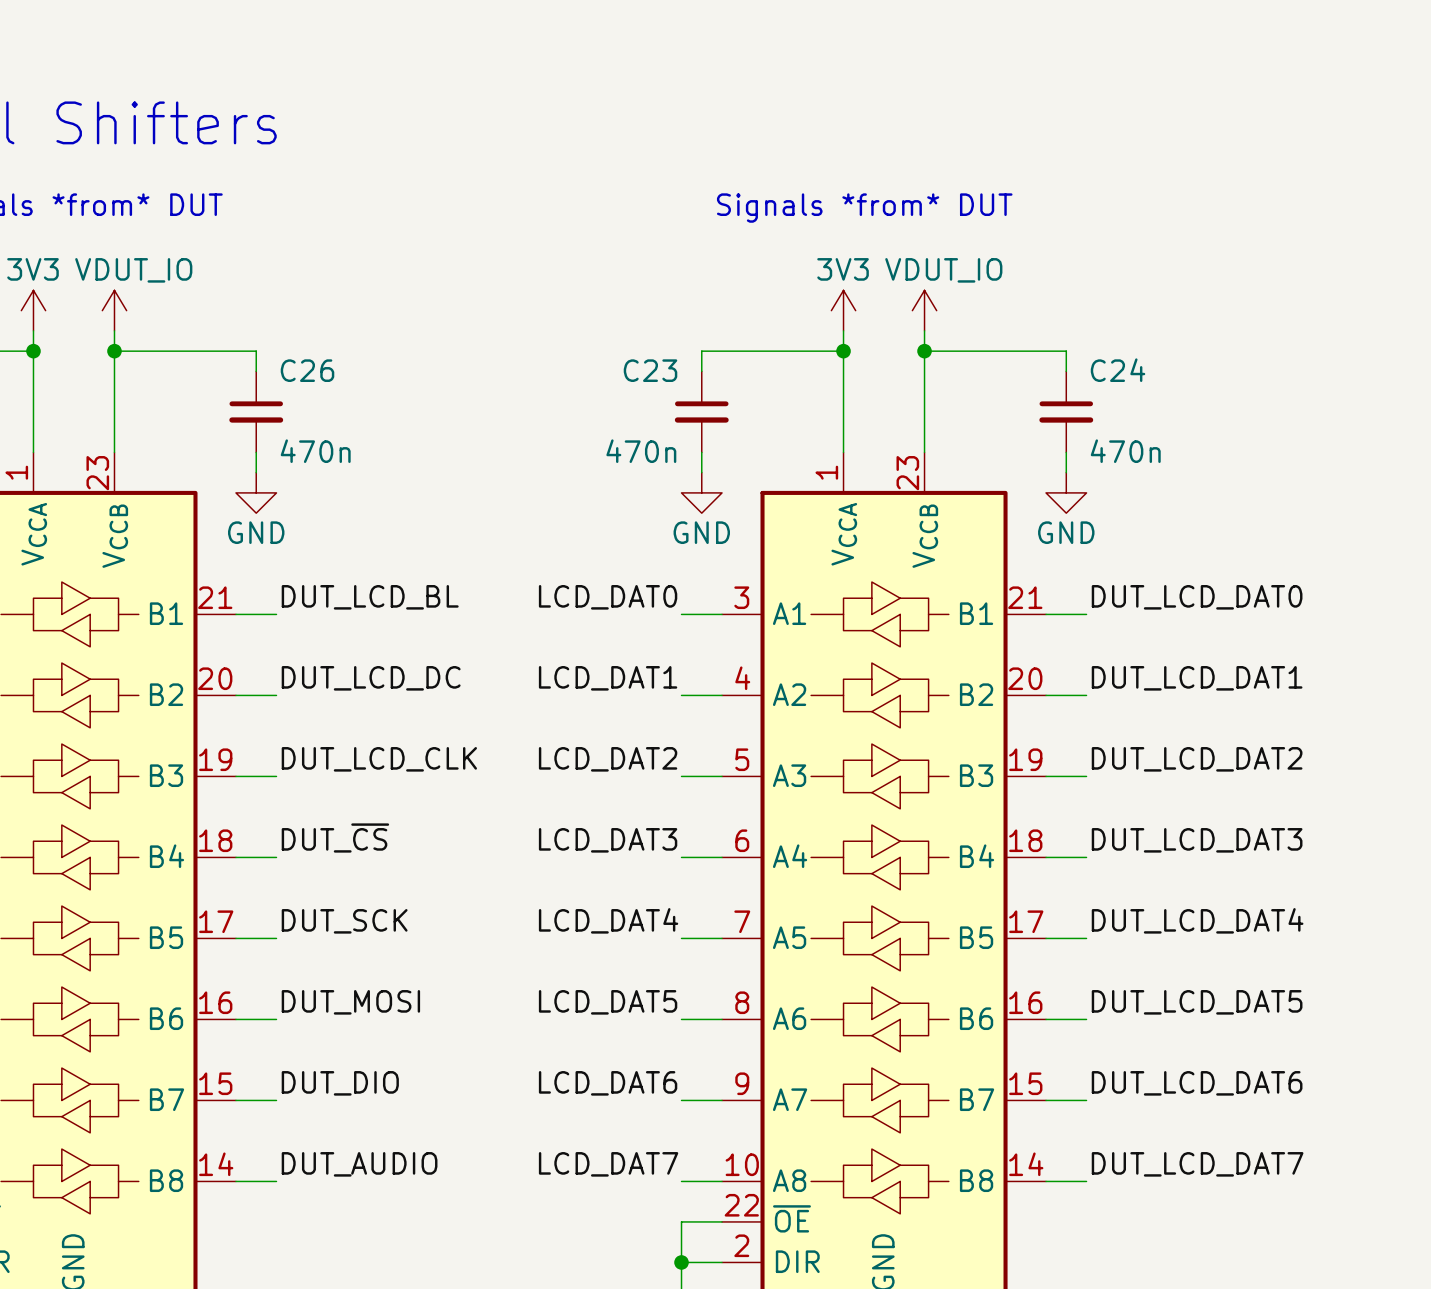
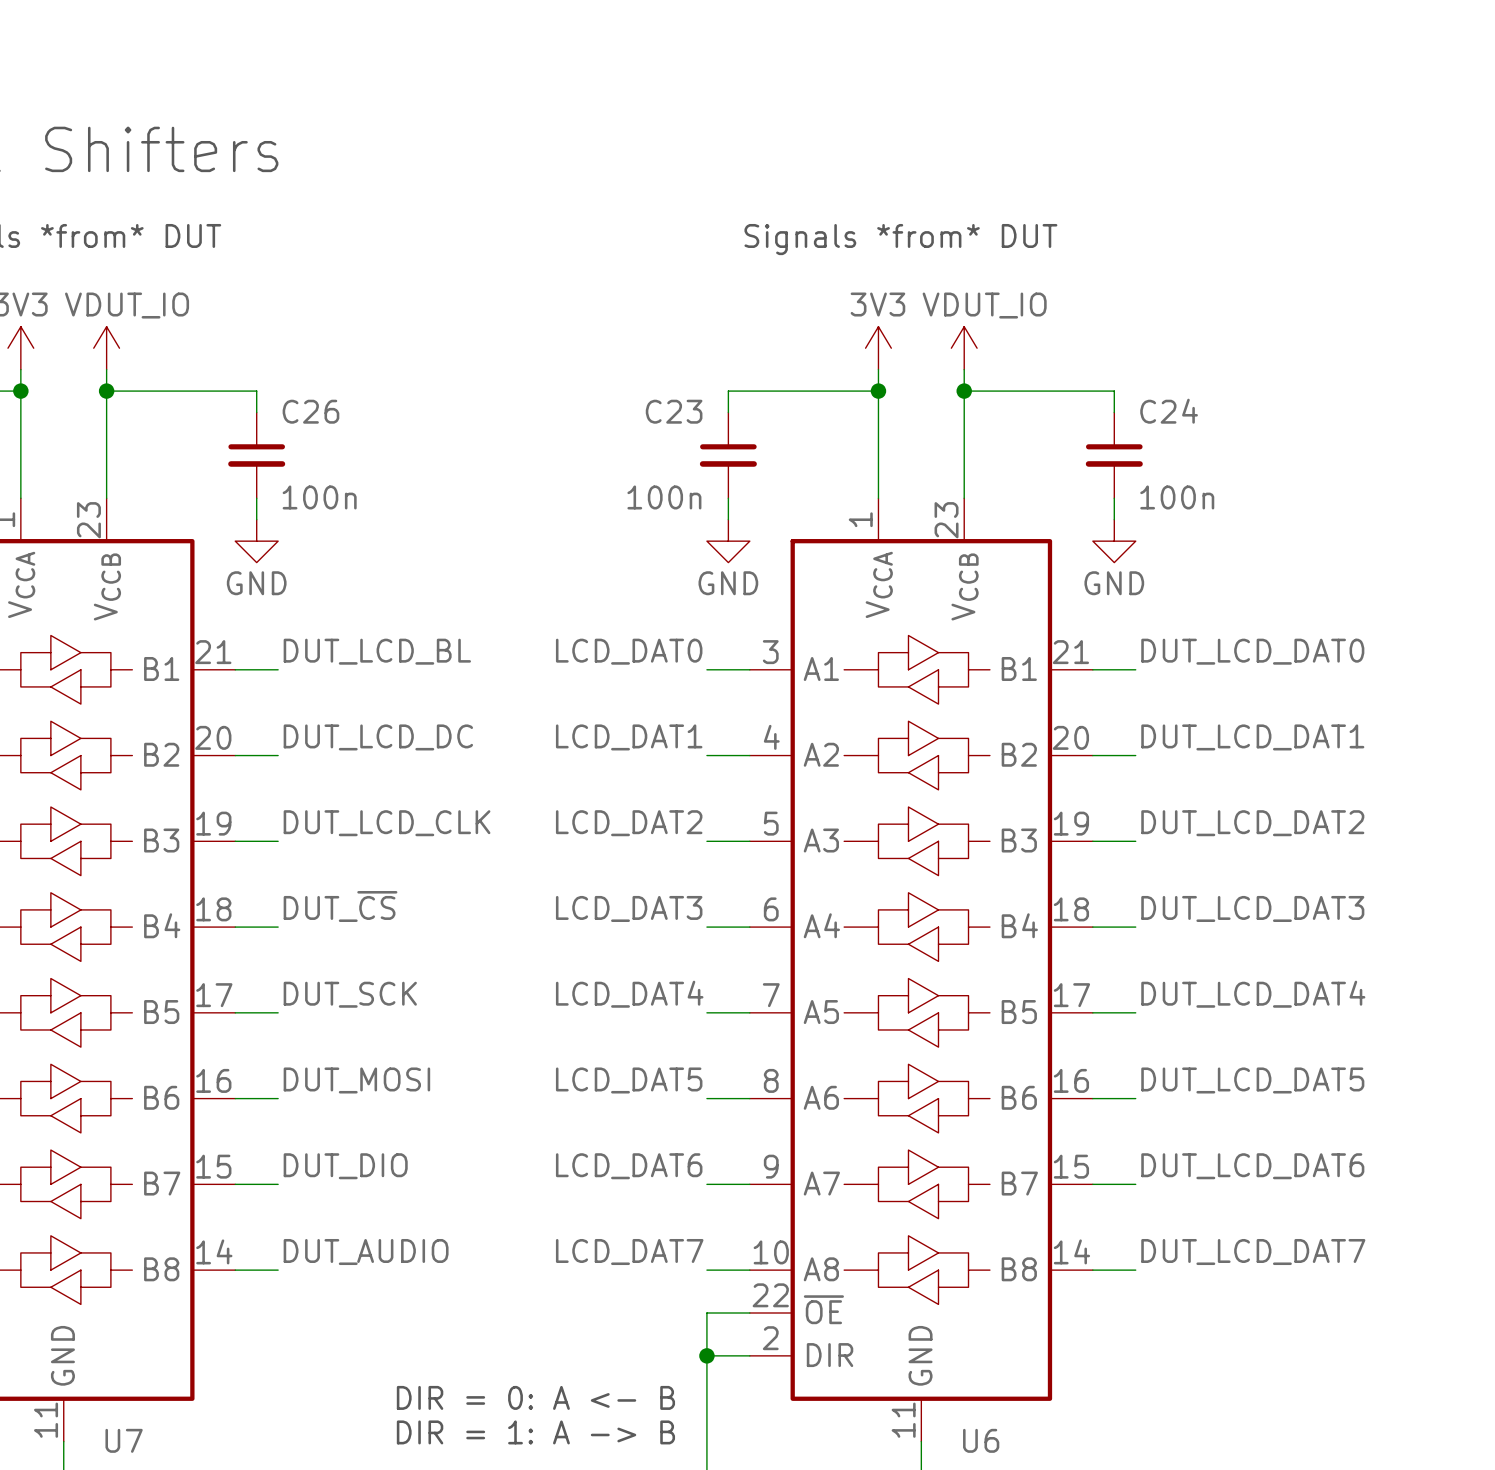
C26 value: 470n (315, 451) -> 100n (319, 497)
C23 value: 470n (641, 451) -> 100n (664, 497)
C24 value: 470n (1125, 451) -> 100n (1177, 497)

